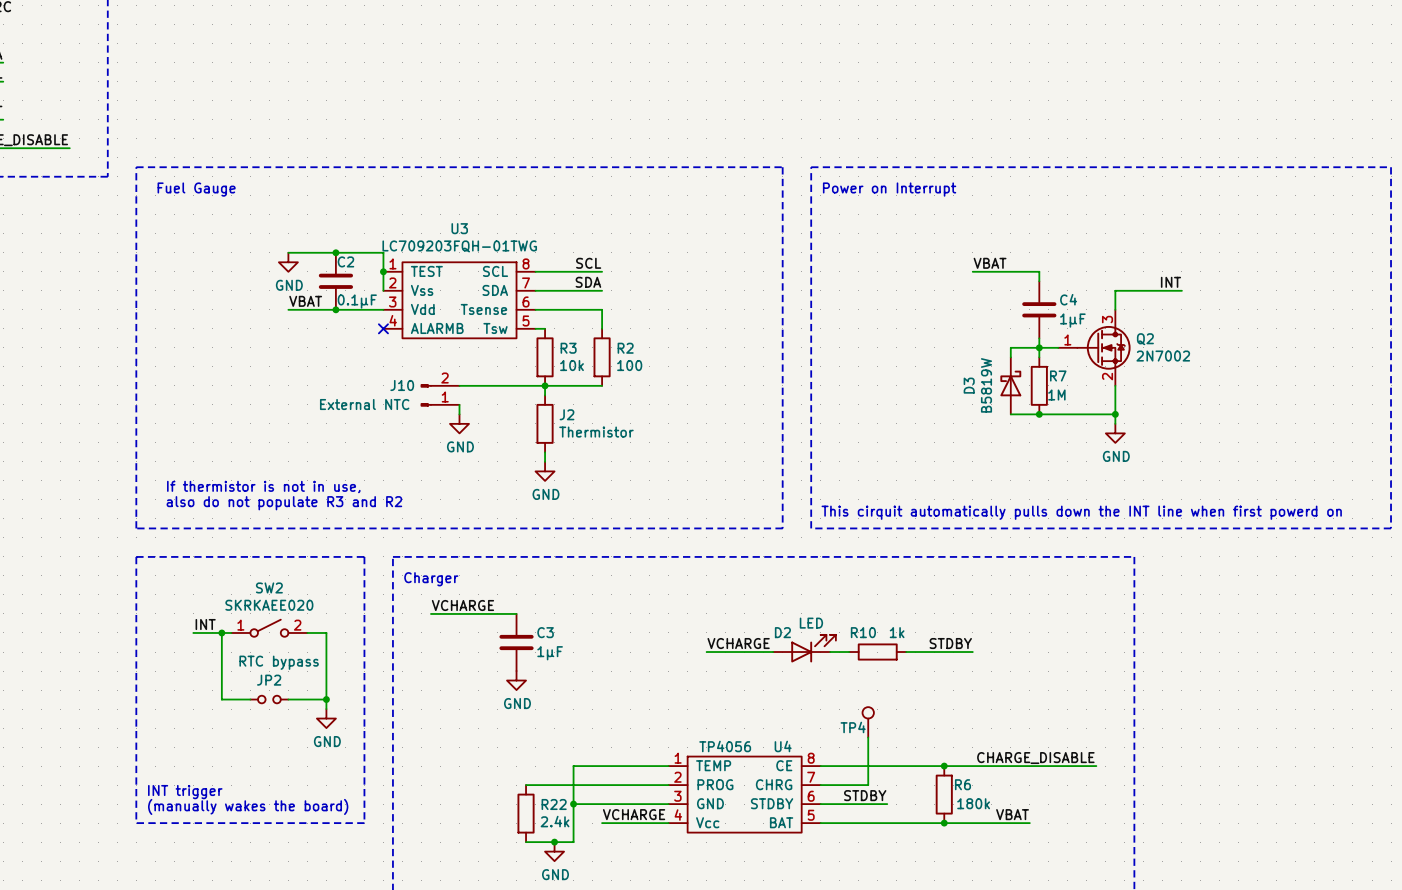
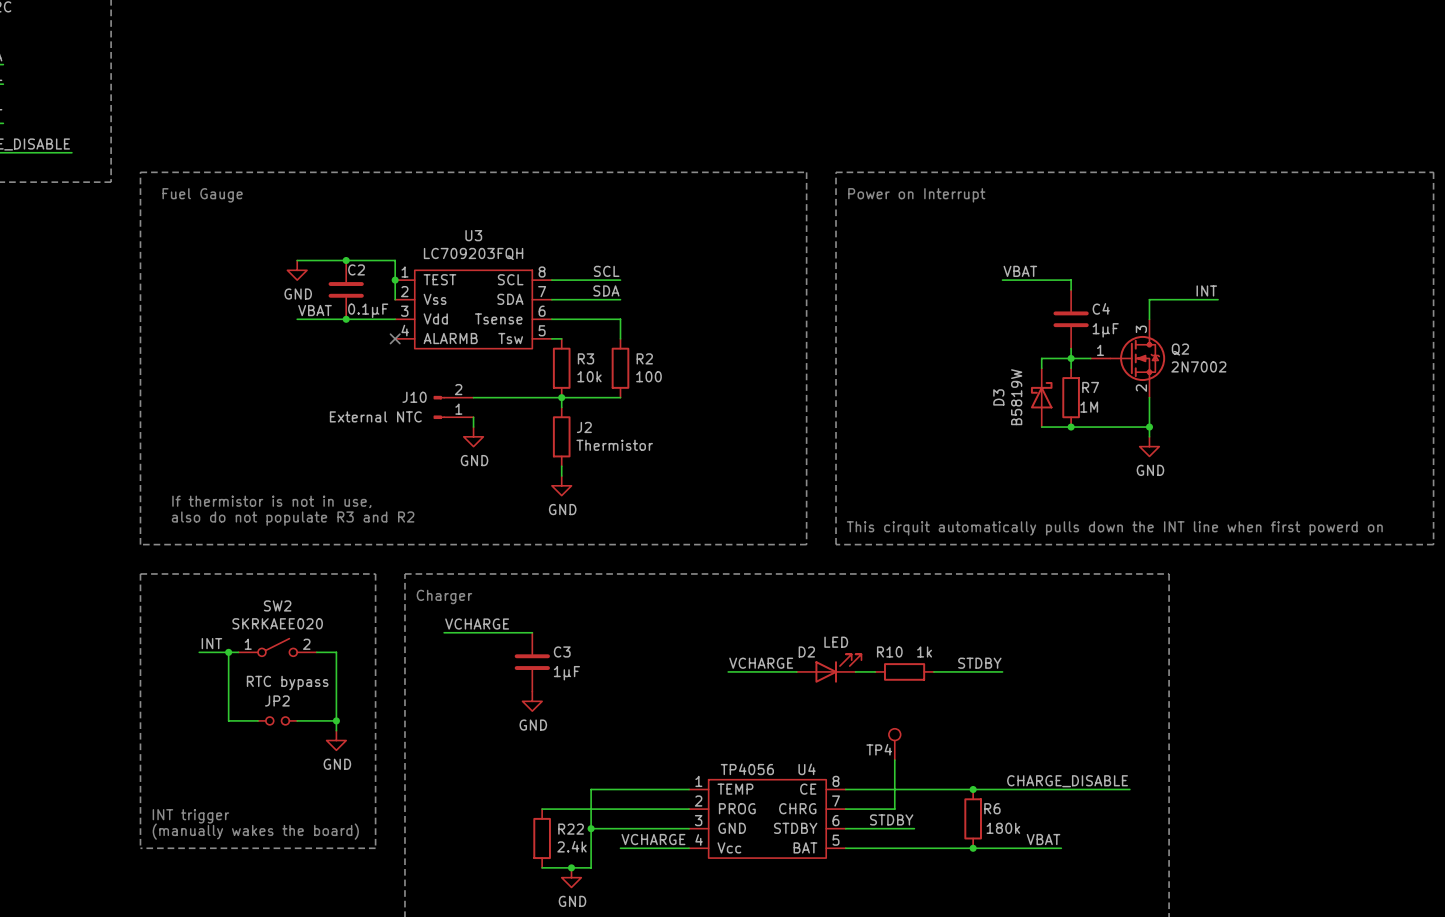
U3 value: LC709203FQH-01TWG (459, 246) -> LC709203FQH (473, 253)

